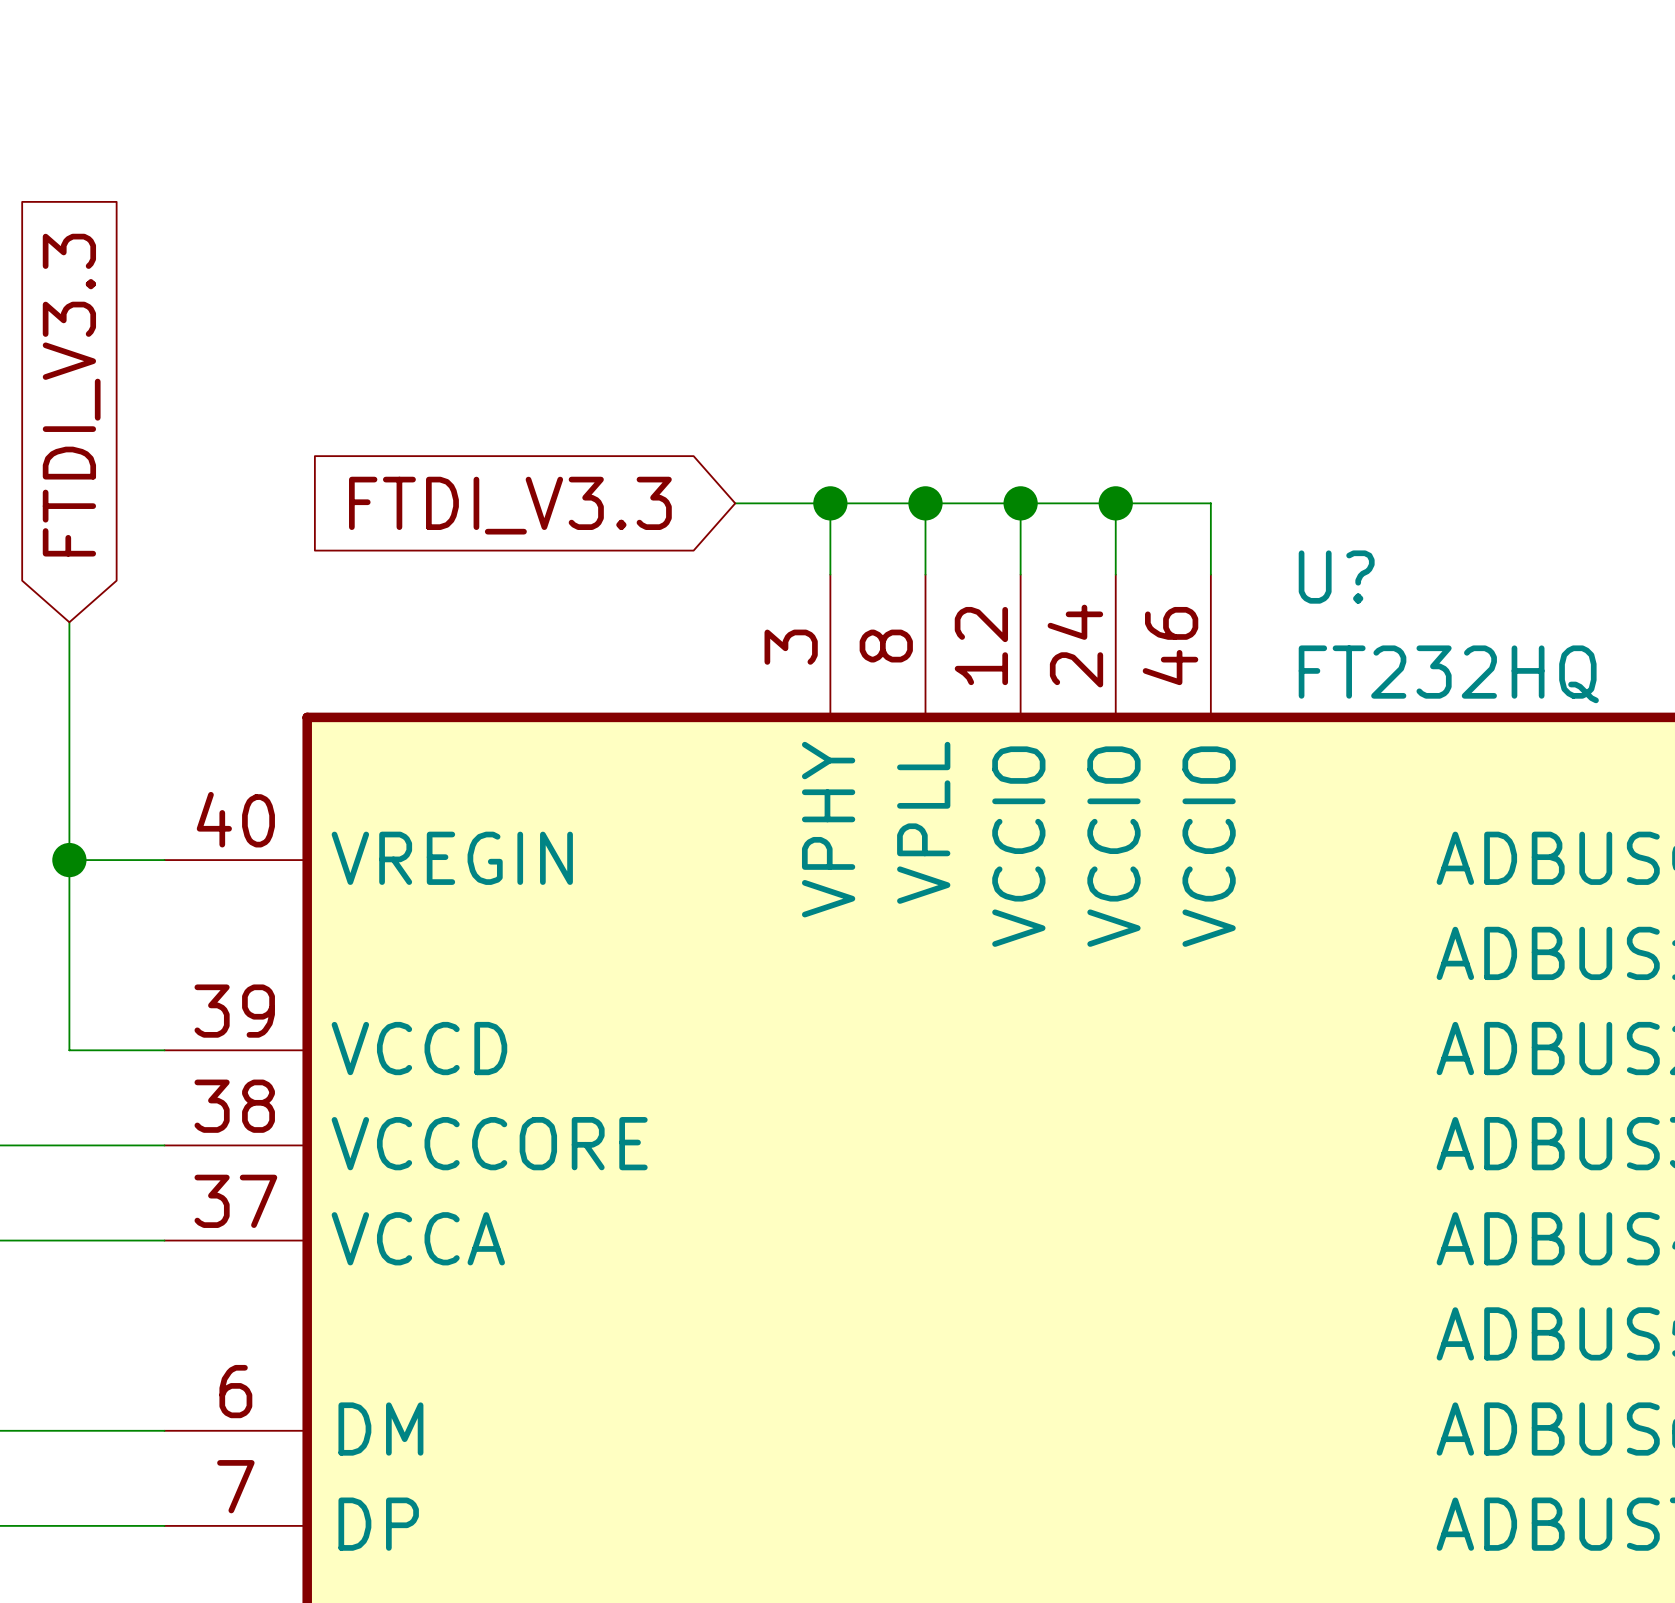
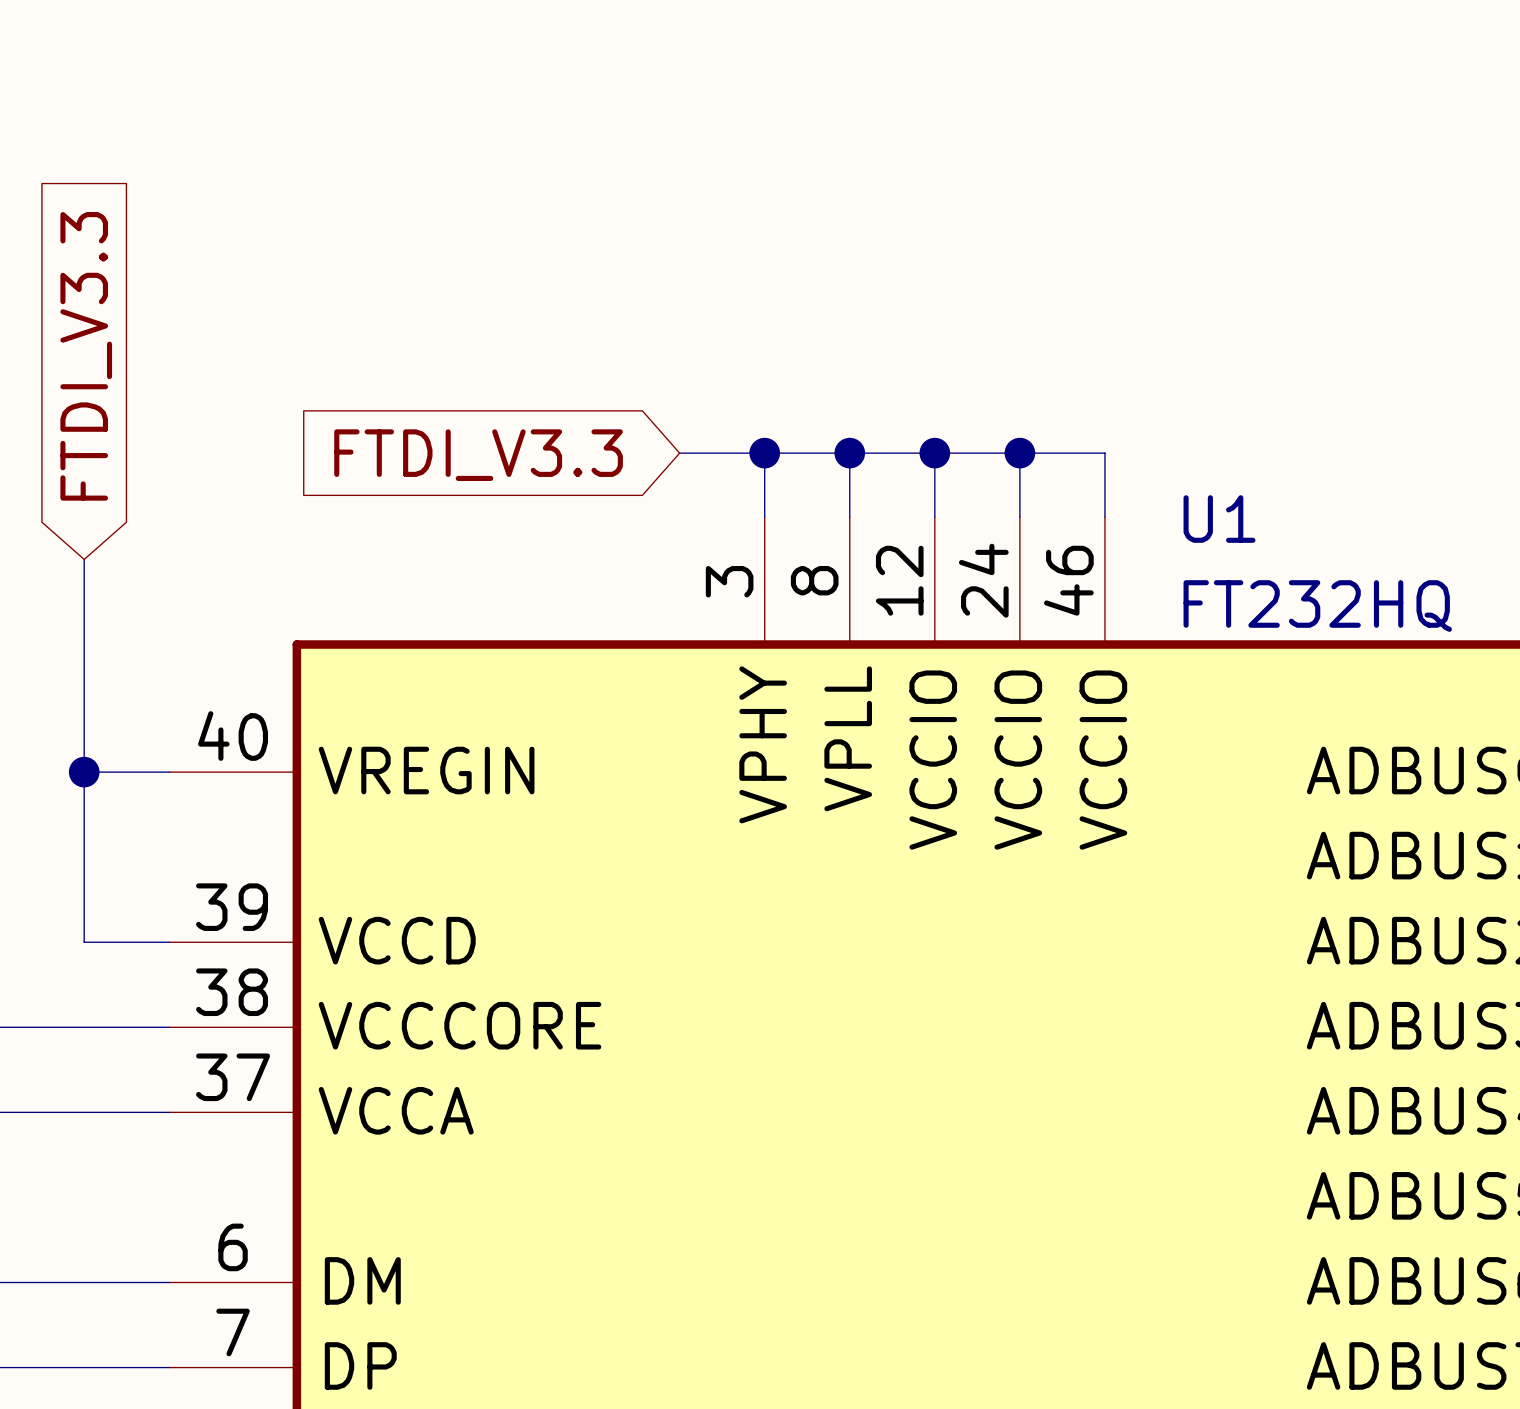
U? name: U? (1336, 577) -> U1 (1219, 519)

